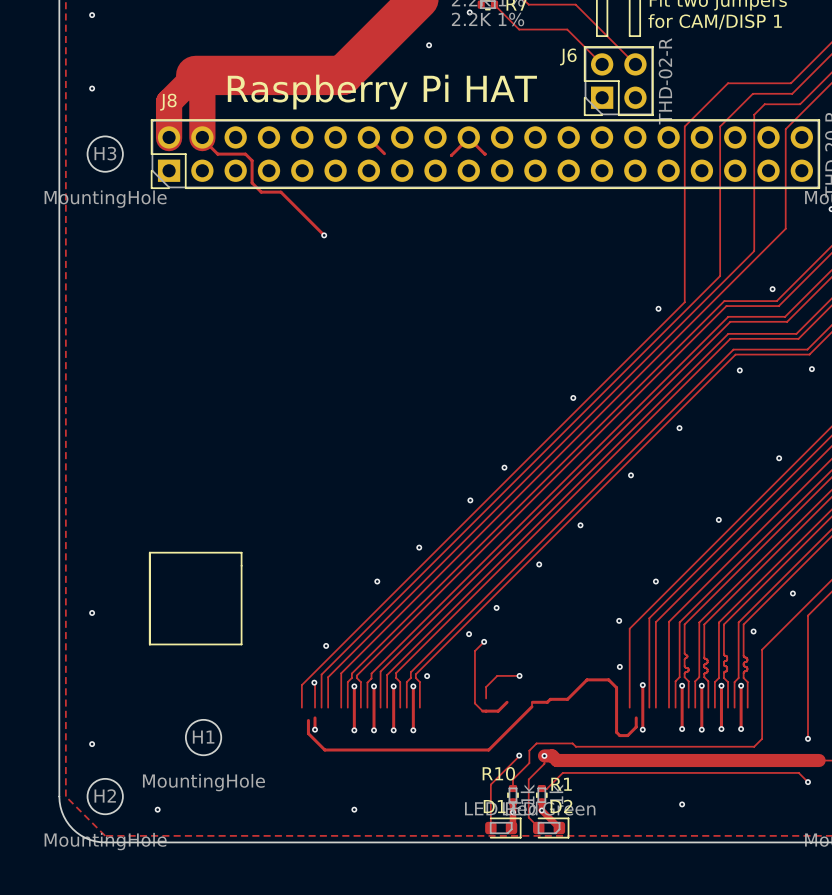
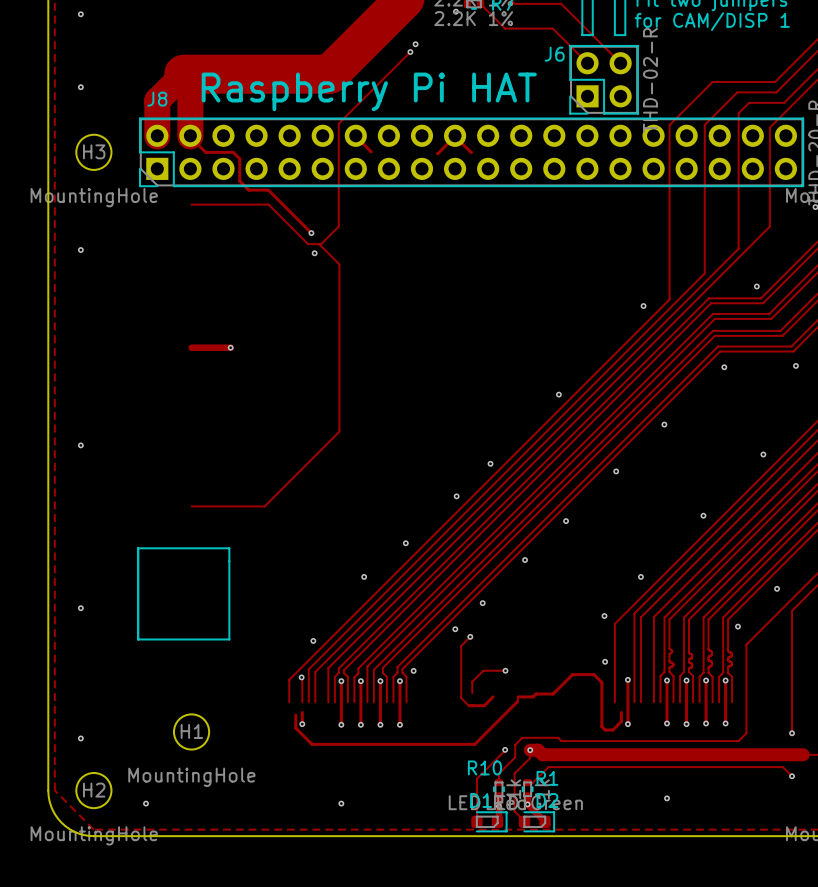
track: none -> (410, 52) (338, 123) (338, 226) (321, 244) (308, 244) (268, 204) (191, 204)
via: none -> (410, 52)
track: none -> (319, 244) (339, 264) (339, 431) (264, 506) (191, 506)
via: none -> (80, 250)
via: none -> (314, 253)
track: none -> (191, 347) (230, 347)
via: none -> (230, 347)
via: none -> (80, 445)

